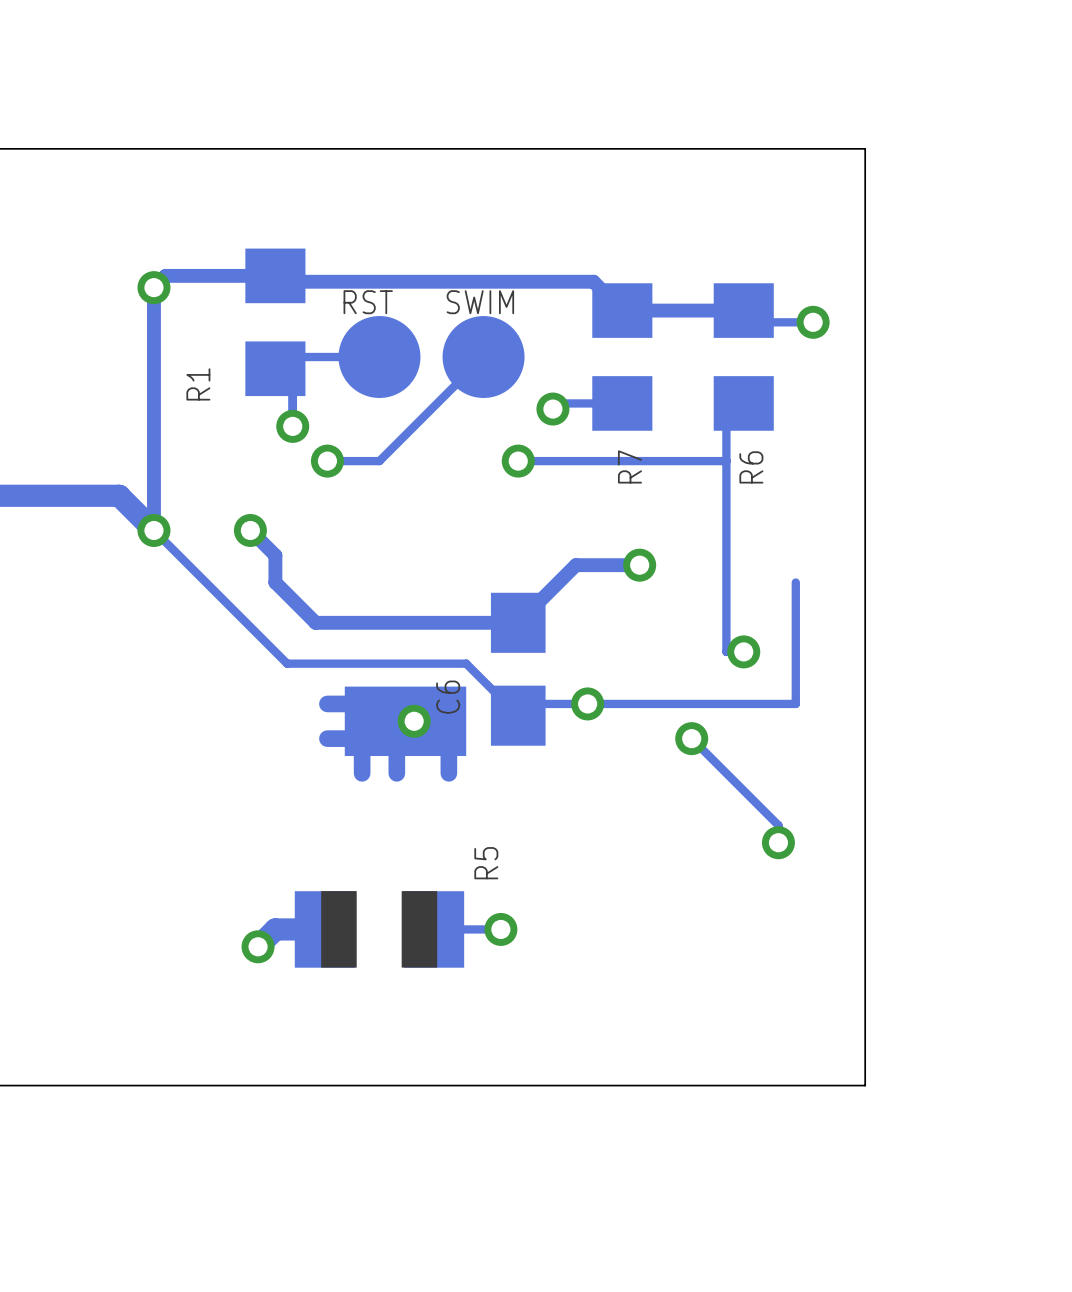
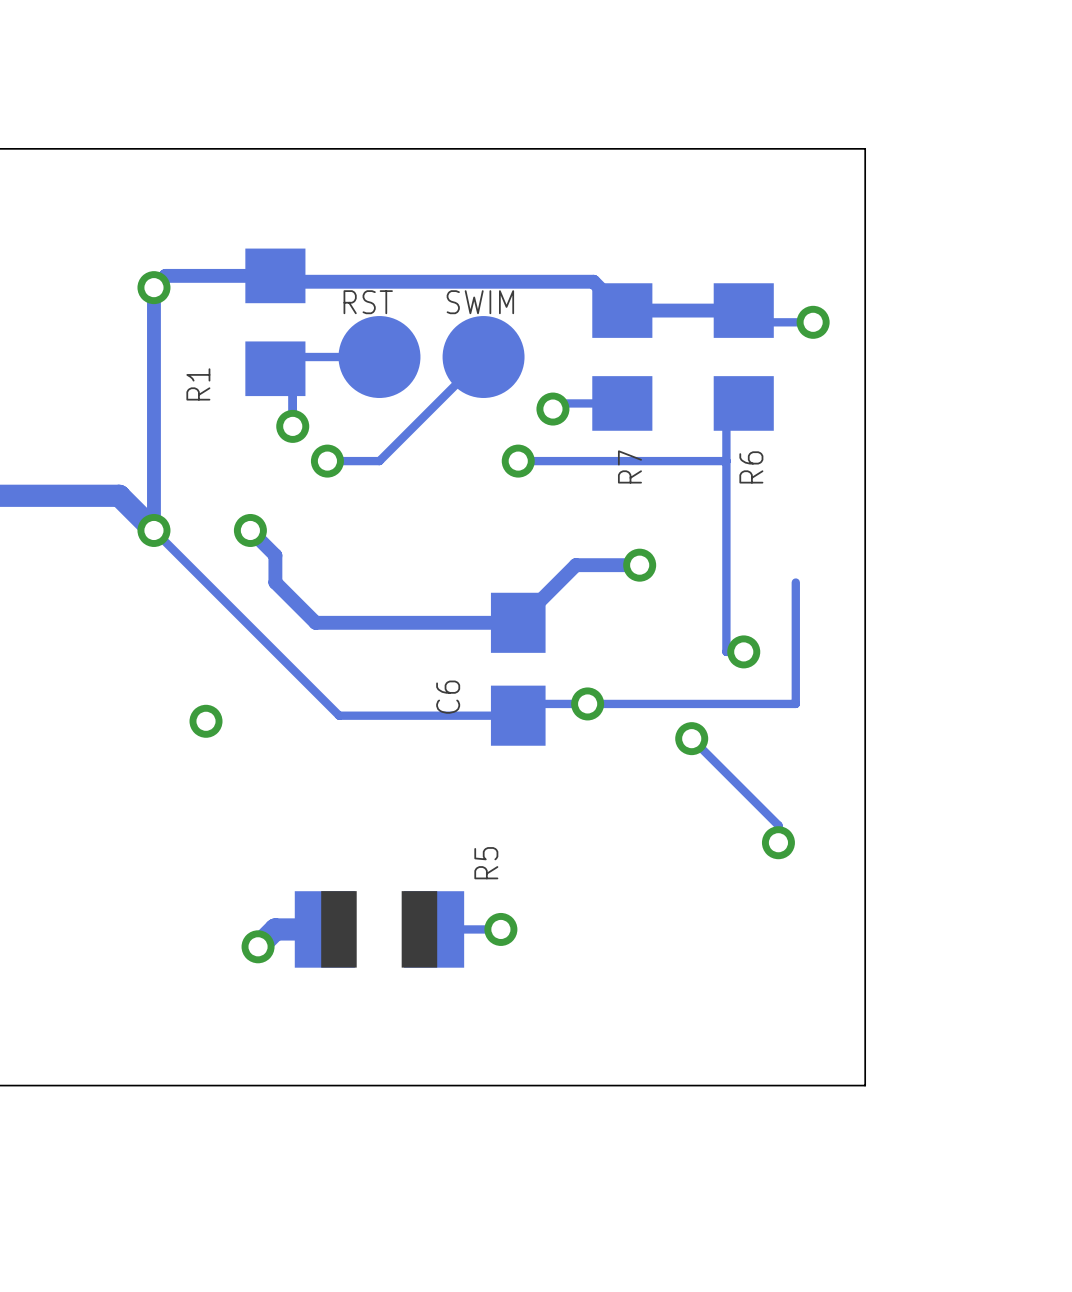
track: (287, 663) (466, 663) (518, 715) -> (287, 663) (339, 715) (518, 715)
drawing: [344, 686, 467, 756] -> none
track: (362, 703) (327, 703) -> none
via position: (414, 721) -> (206, 721)
track: (362, 738) (327, 738) -> none
track: (448, 738) (448, 773) -> none
track: (362, 755) (362, 773) -> none
track: (396, 755) (396, 773) -> none

